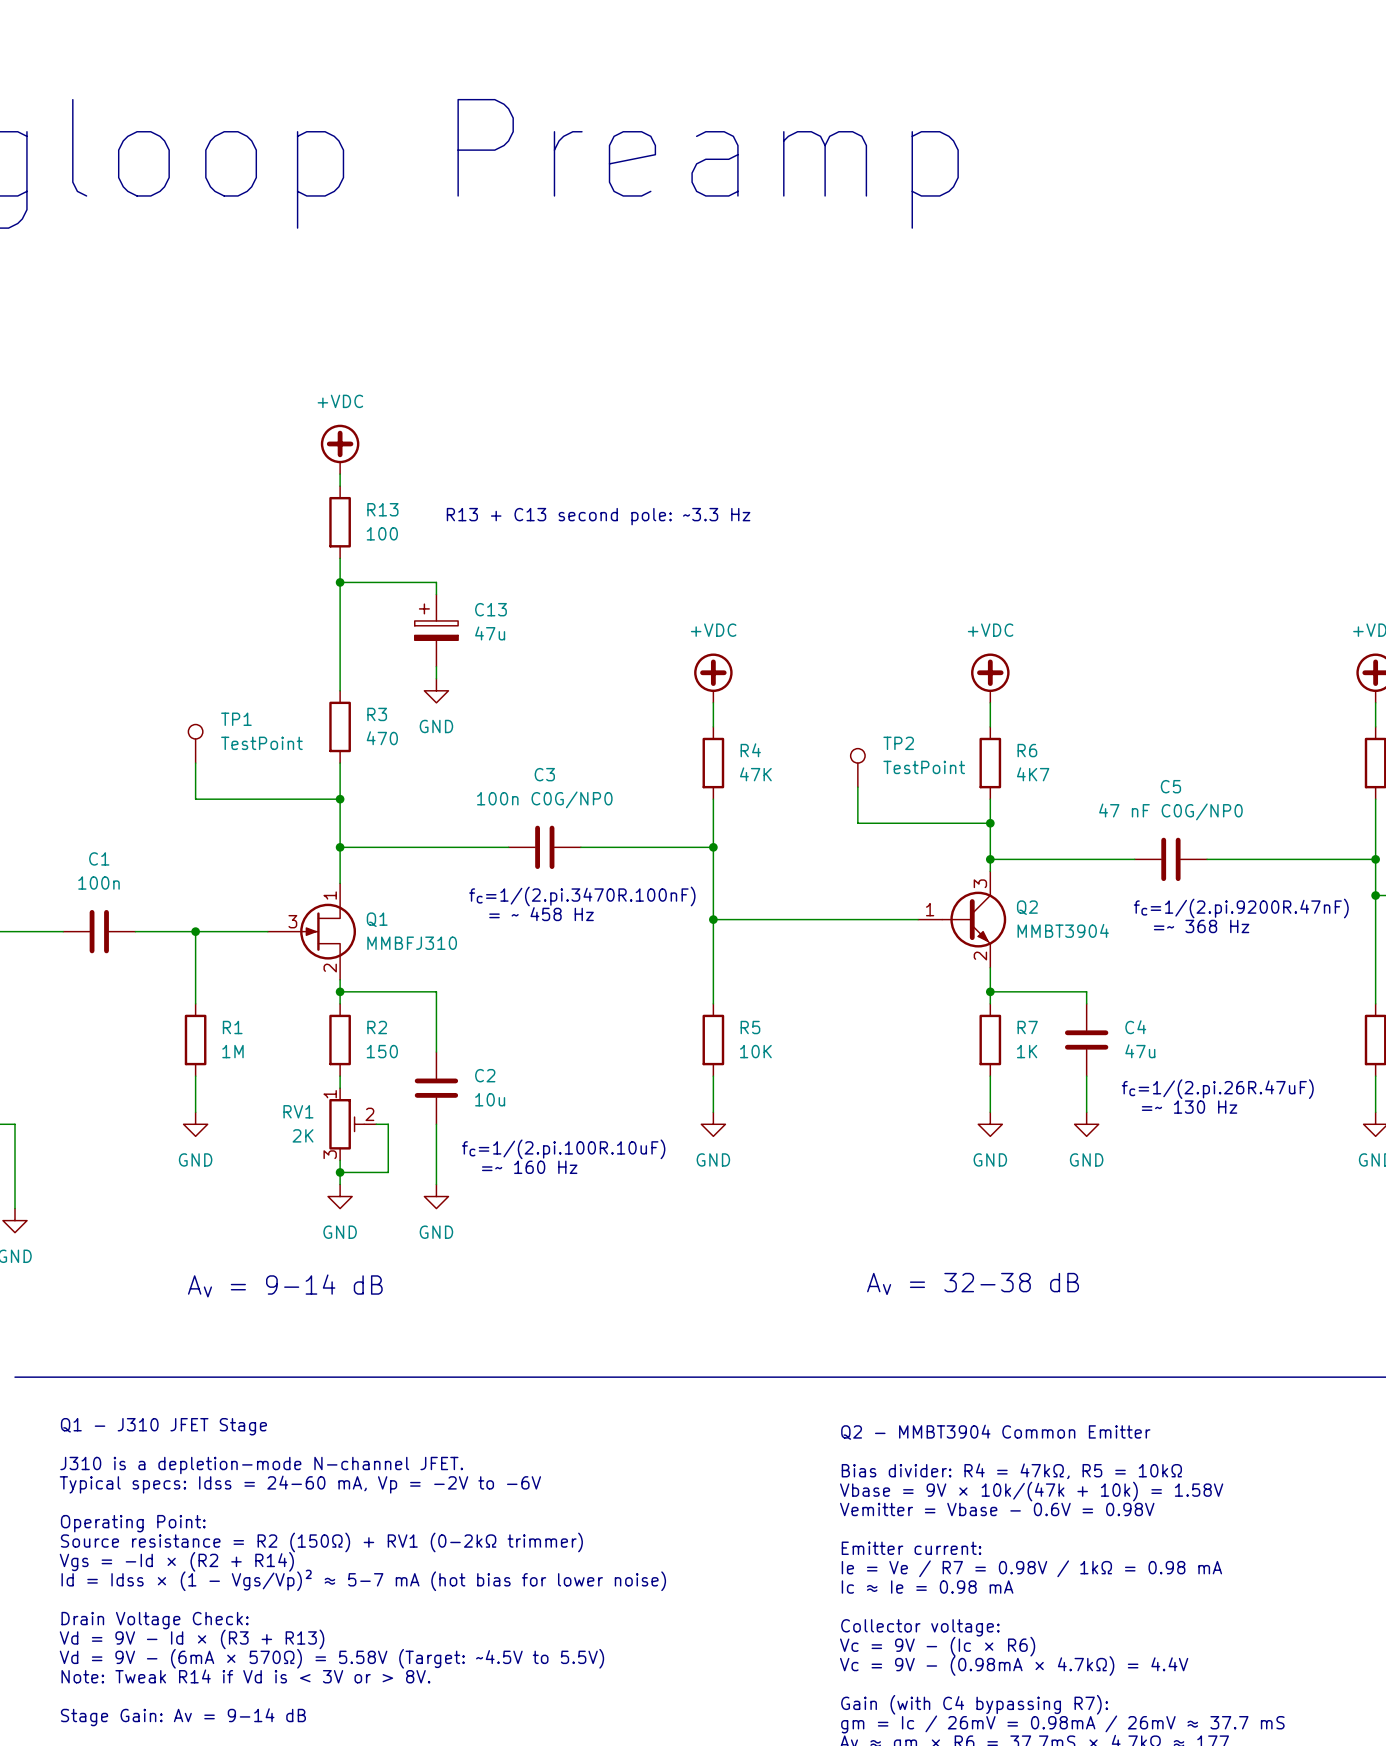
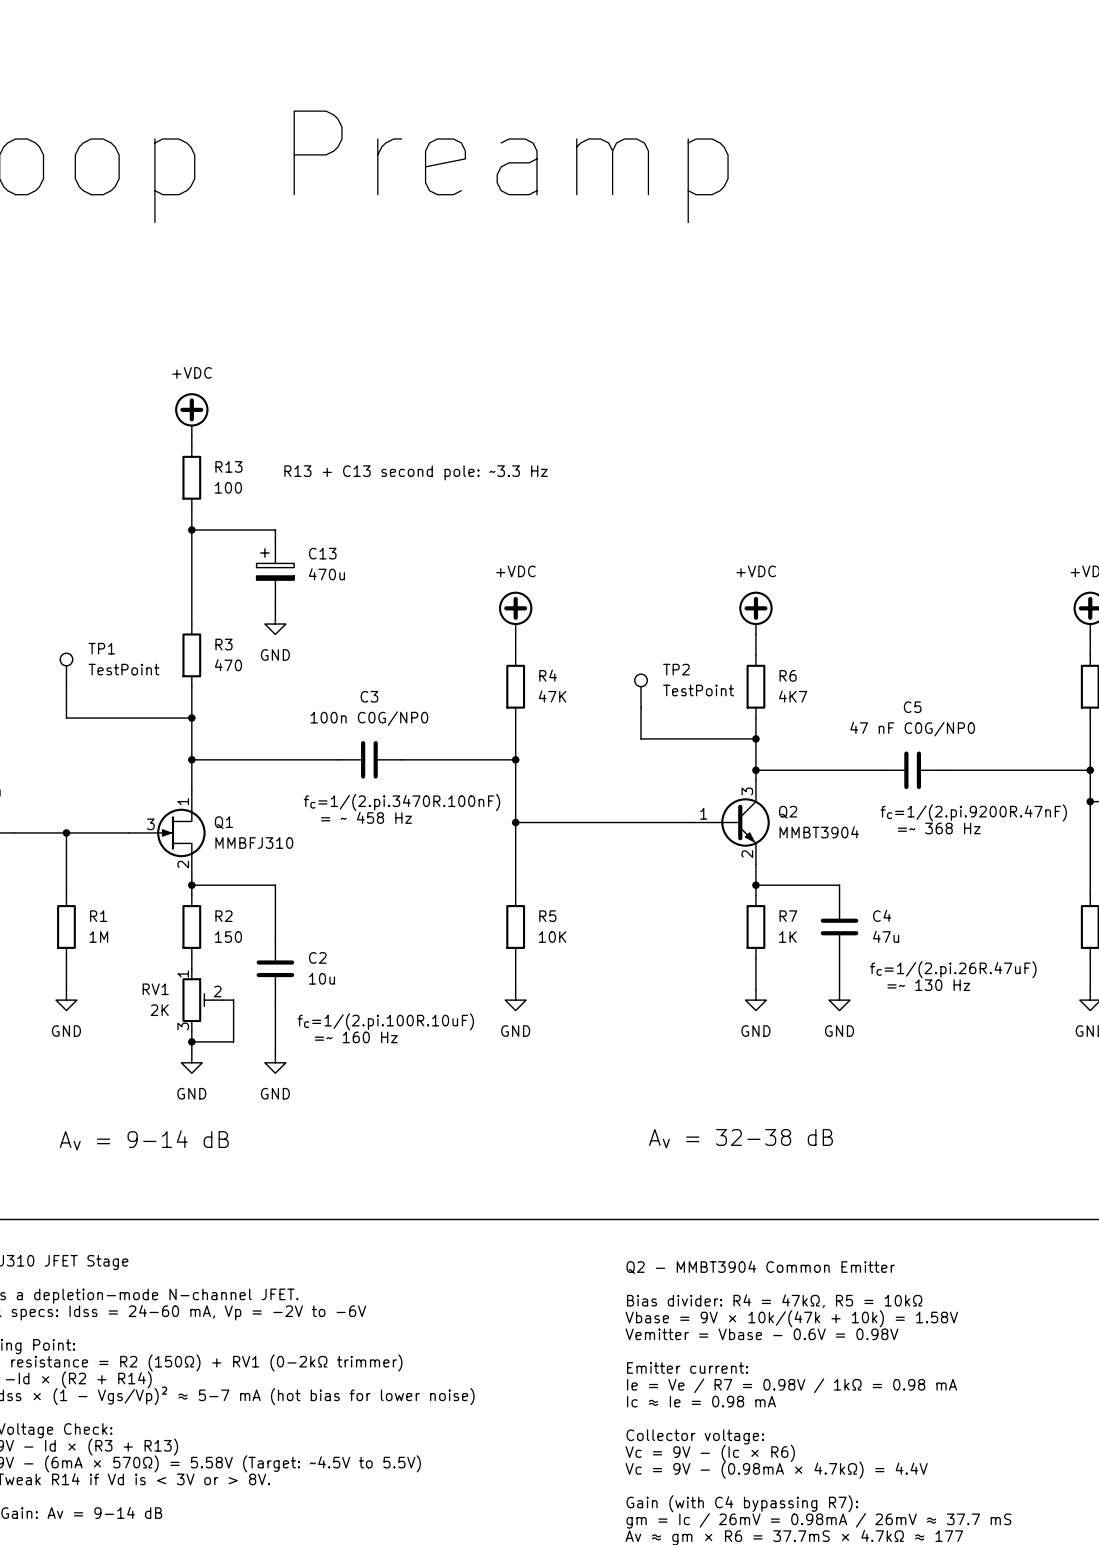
C13 value: 47u (490, 633) -> 470u (326, 574)

